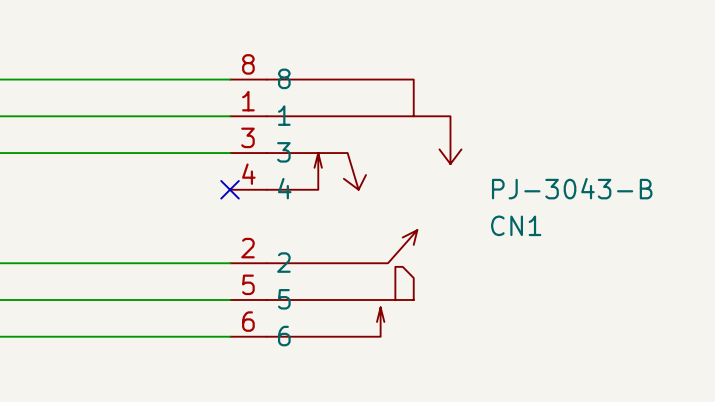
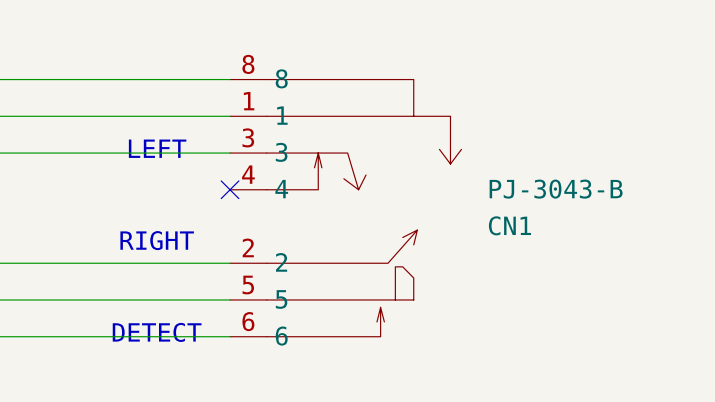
text: none -> LEFT (157, 148)
text: none -> RIGHT (157, 240)
text: none -> DETECT (157, 332)

